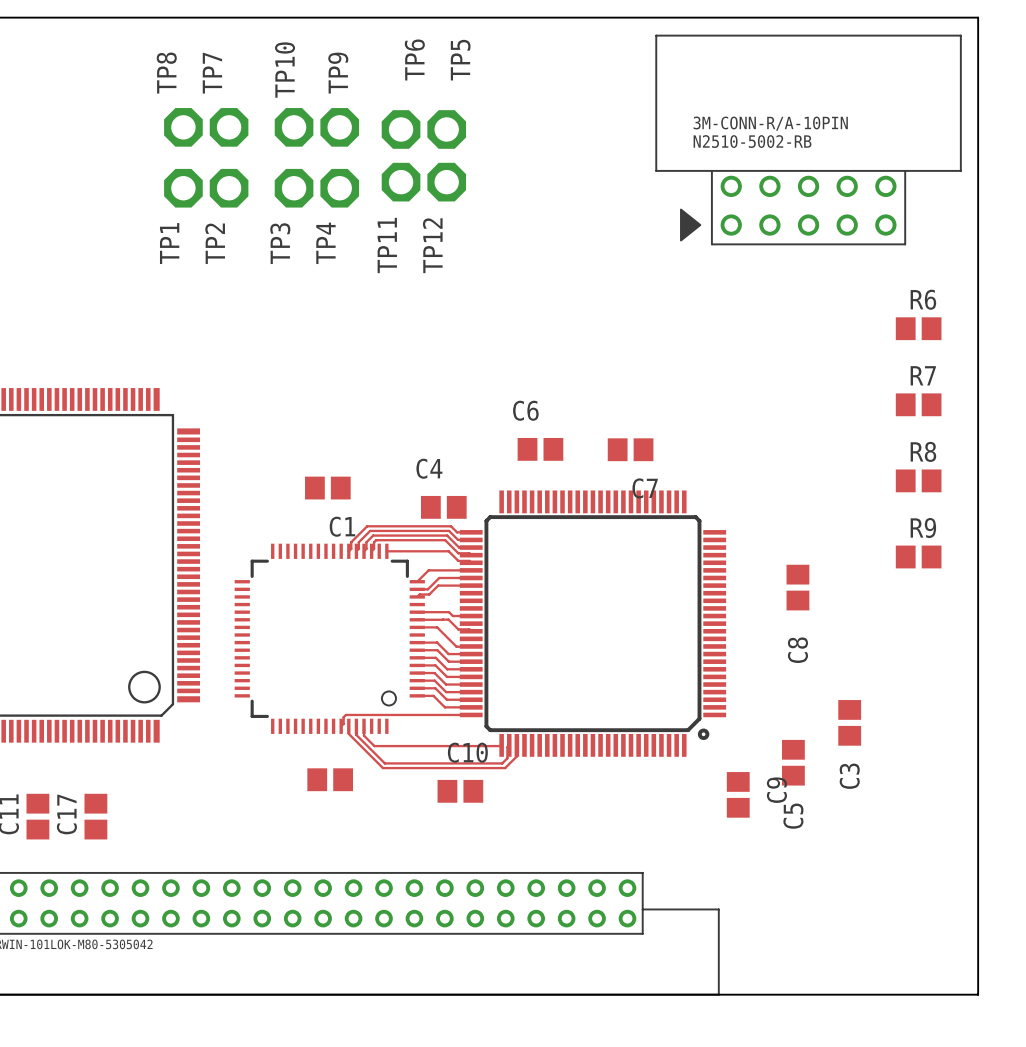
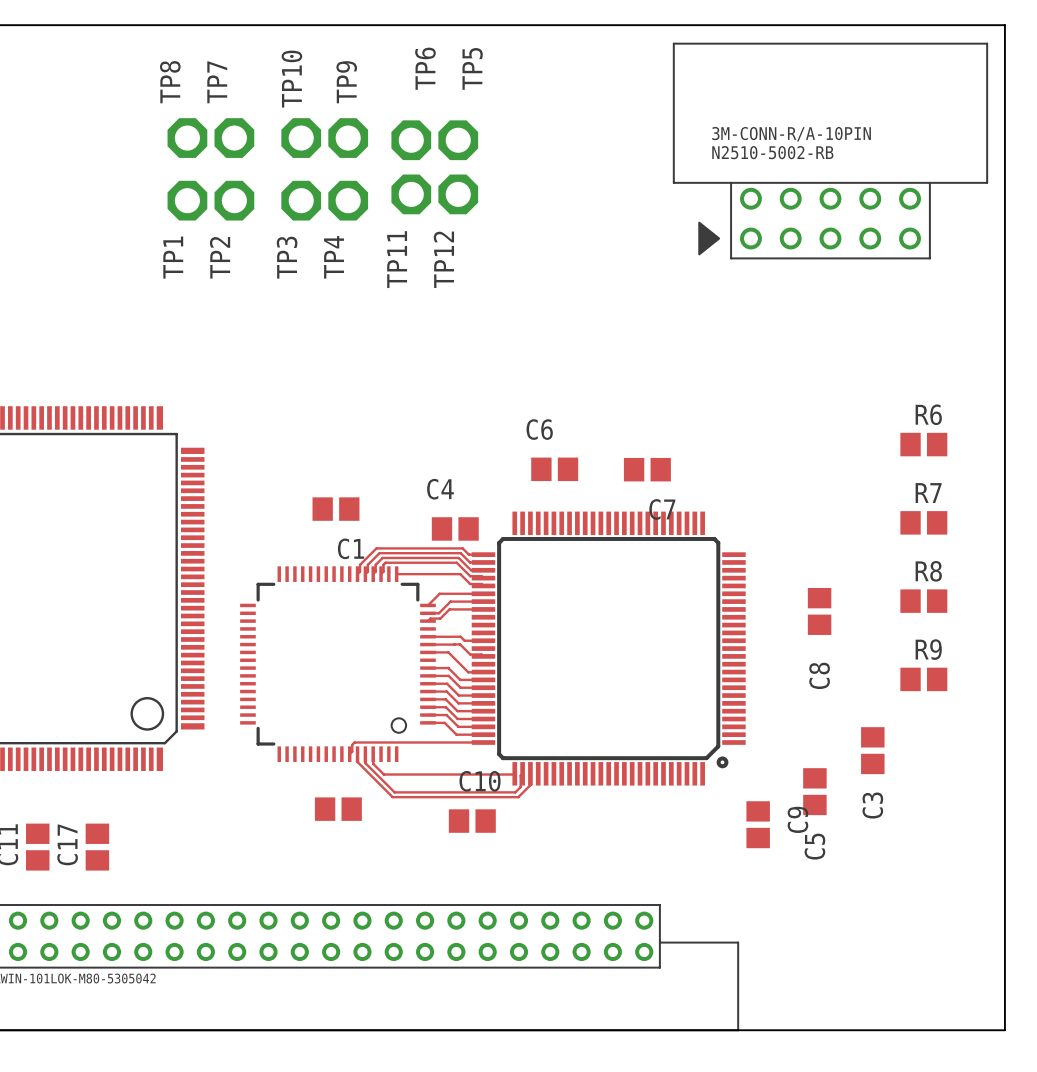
R6 position: (918, 328) -> (923, 444)
R7 position: (918, 404) -> (923, 522)
R8 position: (918, 480) -> (923, 601)
R9 position: (918, 556) -> (923, 679)

